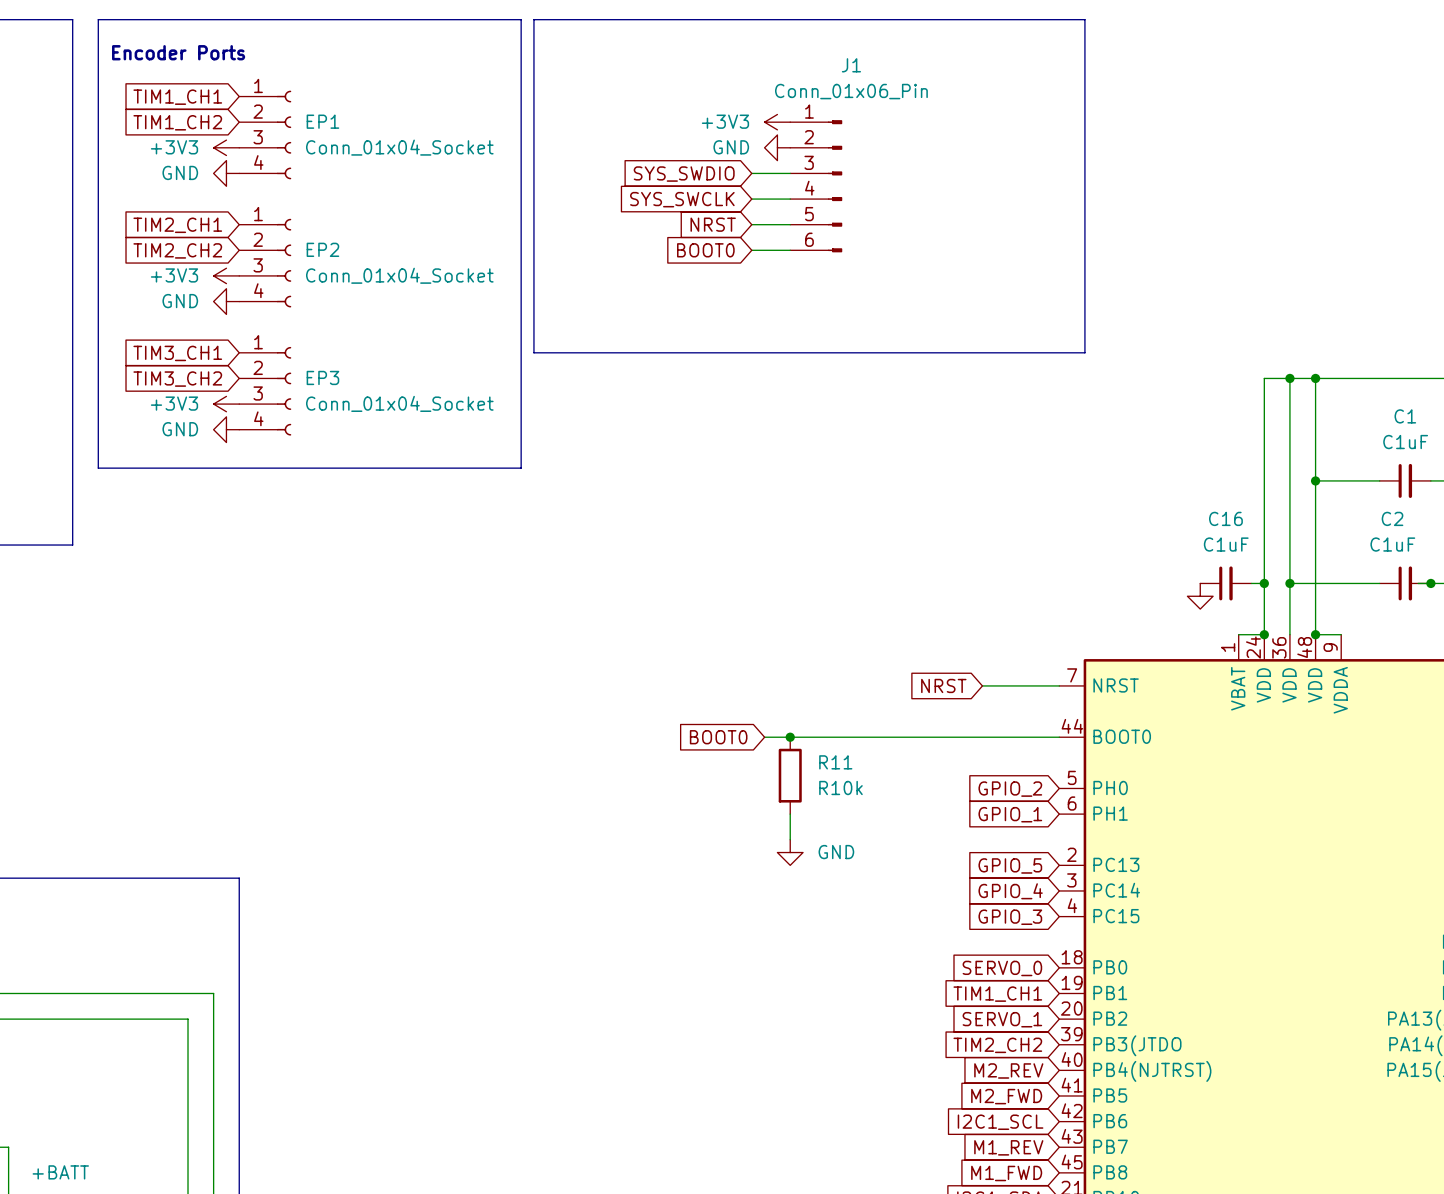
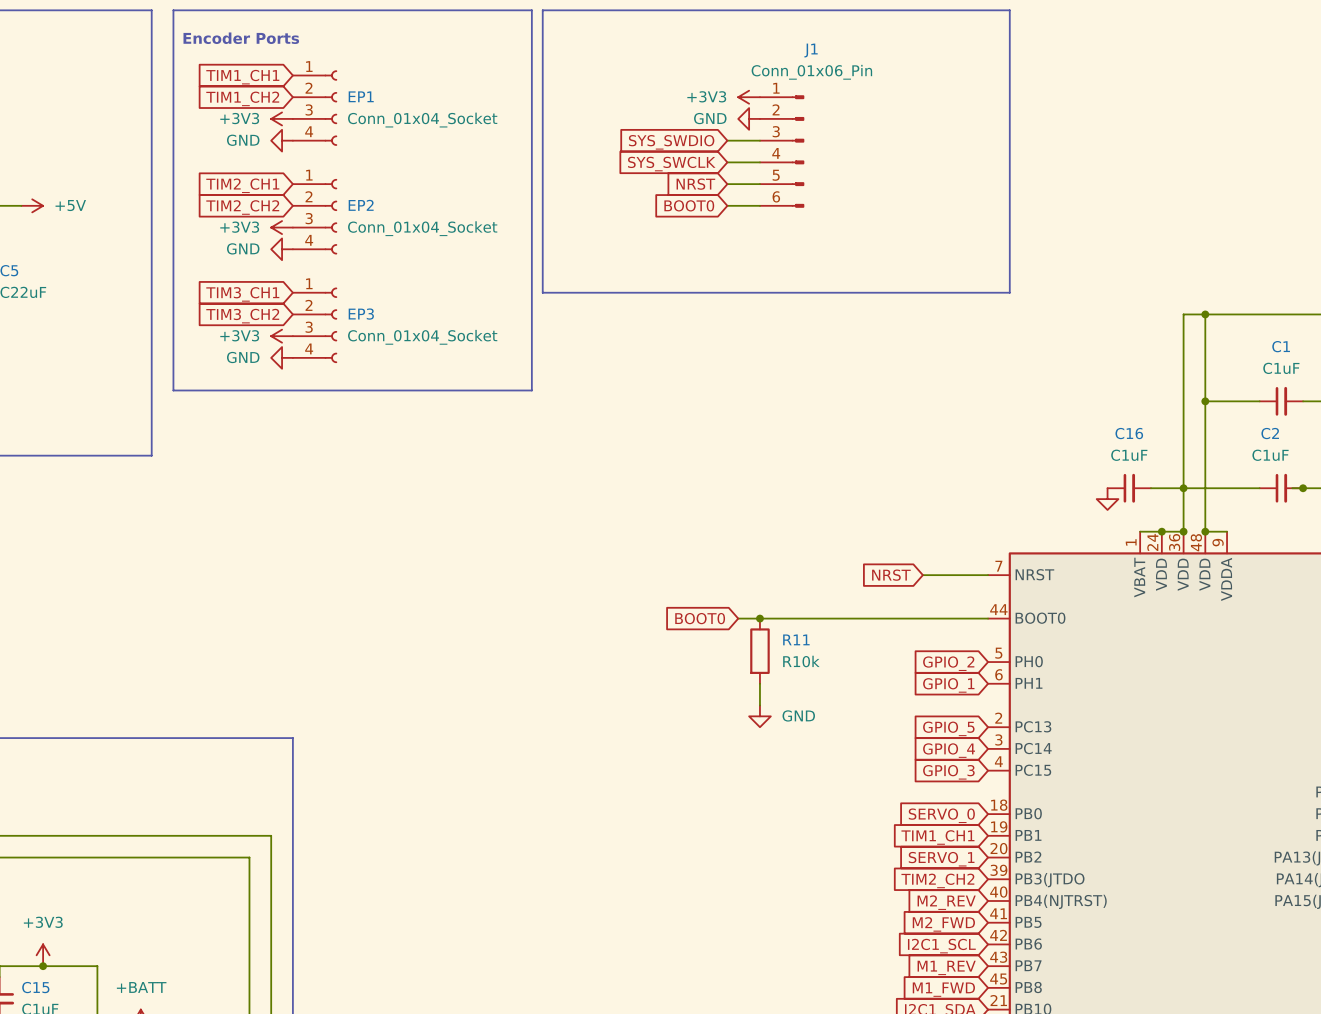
wire: (1289, 378) (1264, 378) (1264, 634) -> (1183, 531) (1161, 531)
junction: (1289, 378) -> none
wire: none -> (1161, 488) (1183, 488)
junction position: (1264, 583) -> (1183, 531)

